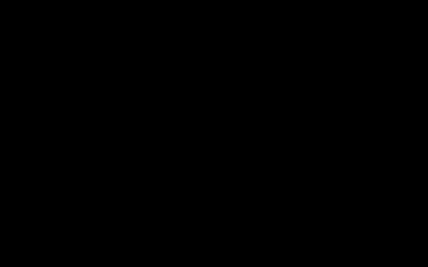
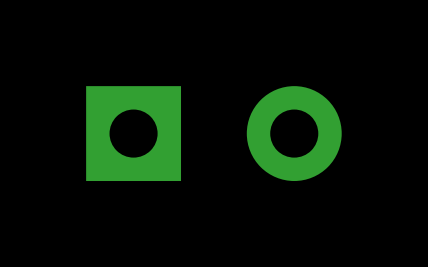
part: none -> (213, 133)

